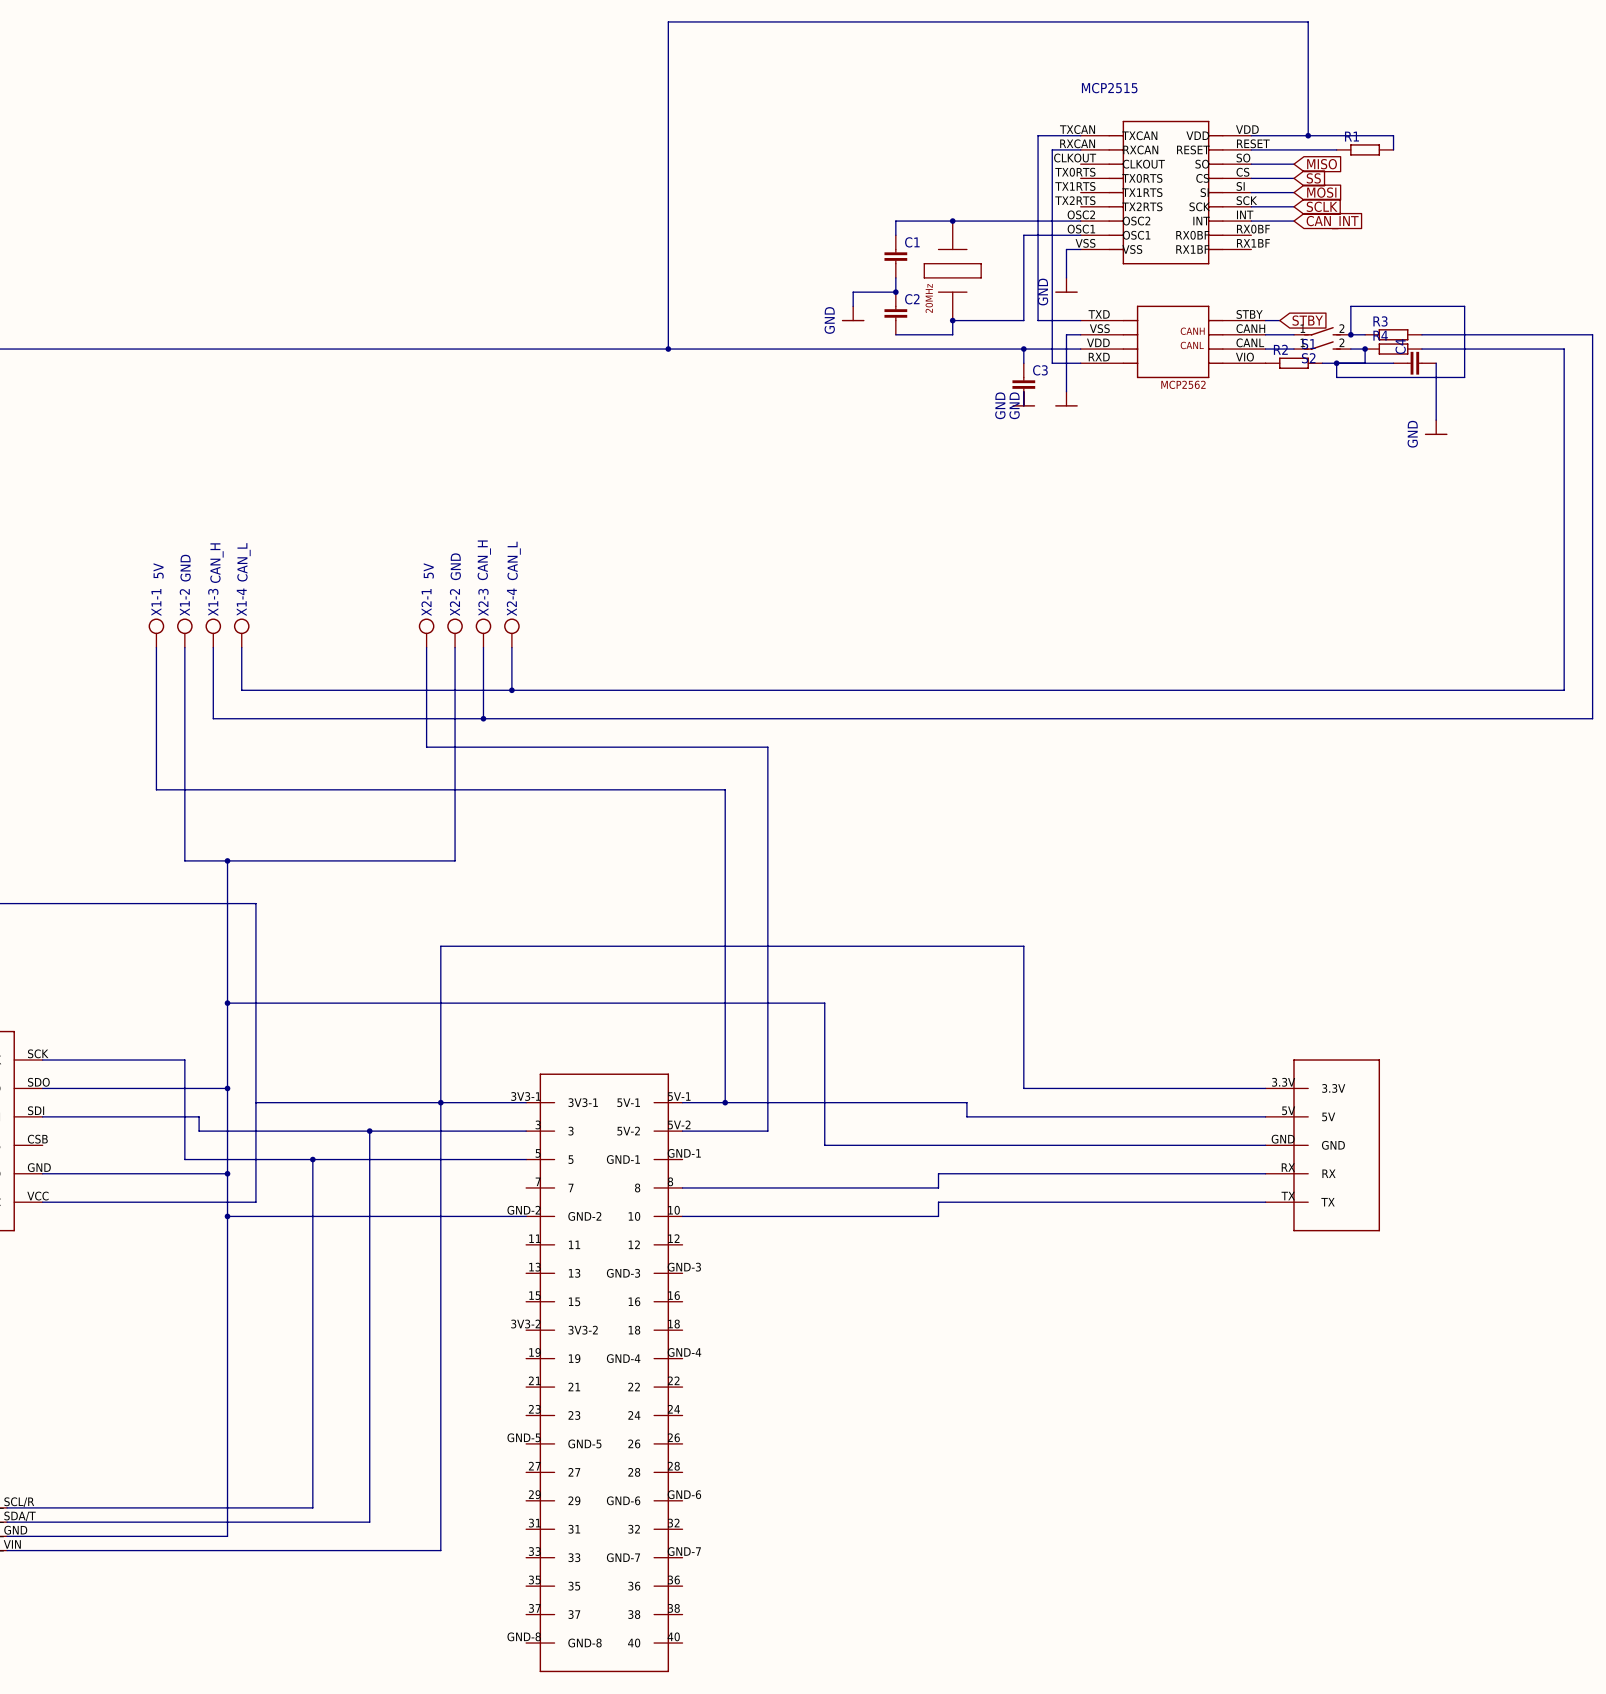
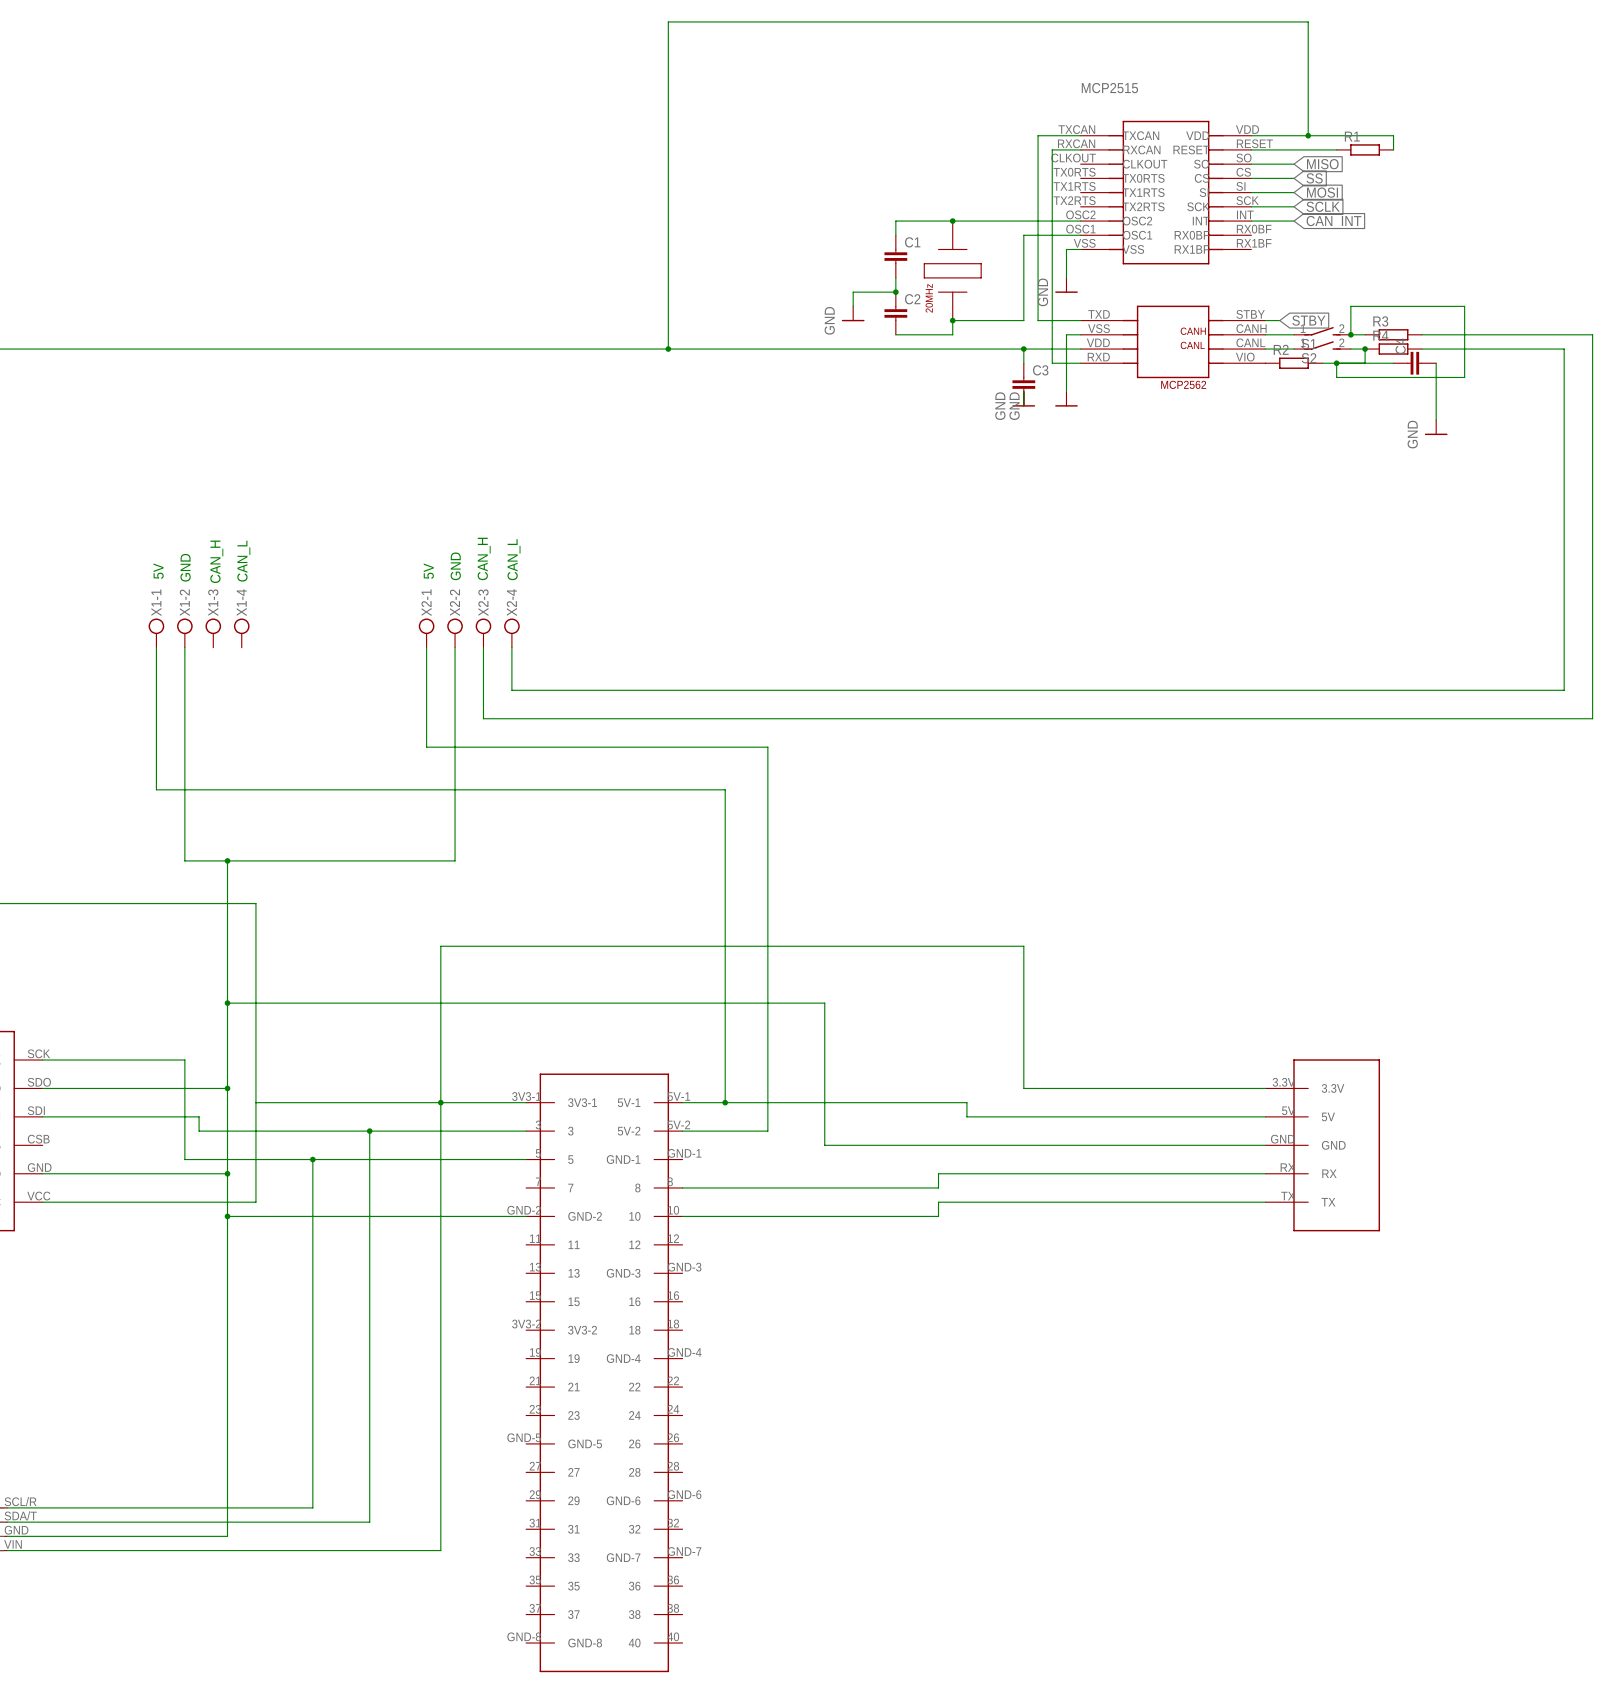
wire: (213, 647) (213, 718) (483, 718) -> none
wire: (241, 647) (241, 690) (511, 690) -> none
junction: (511, 690) -> none
junction: (483, 718) -> none

